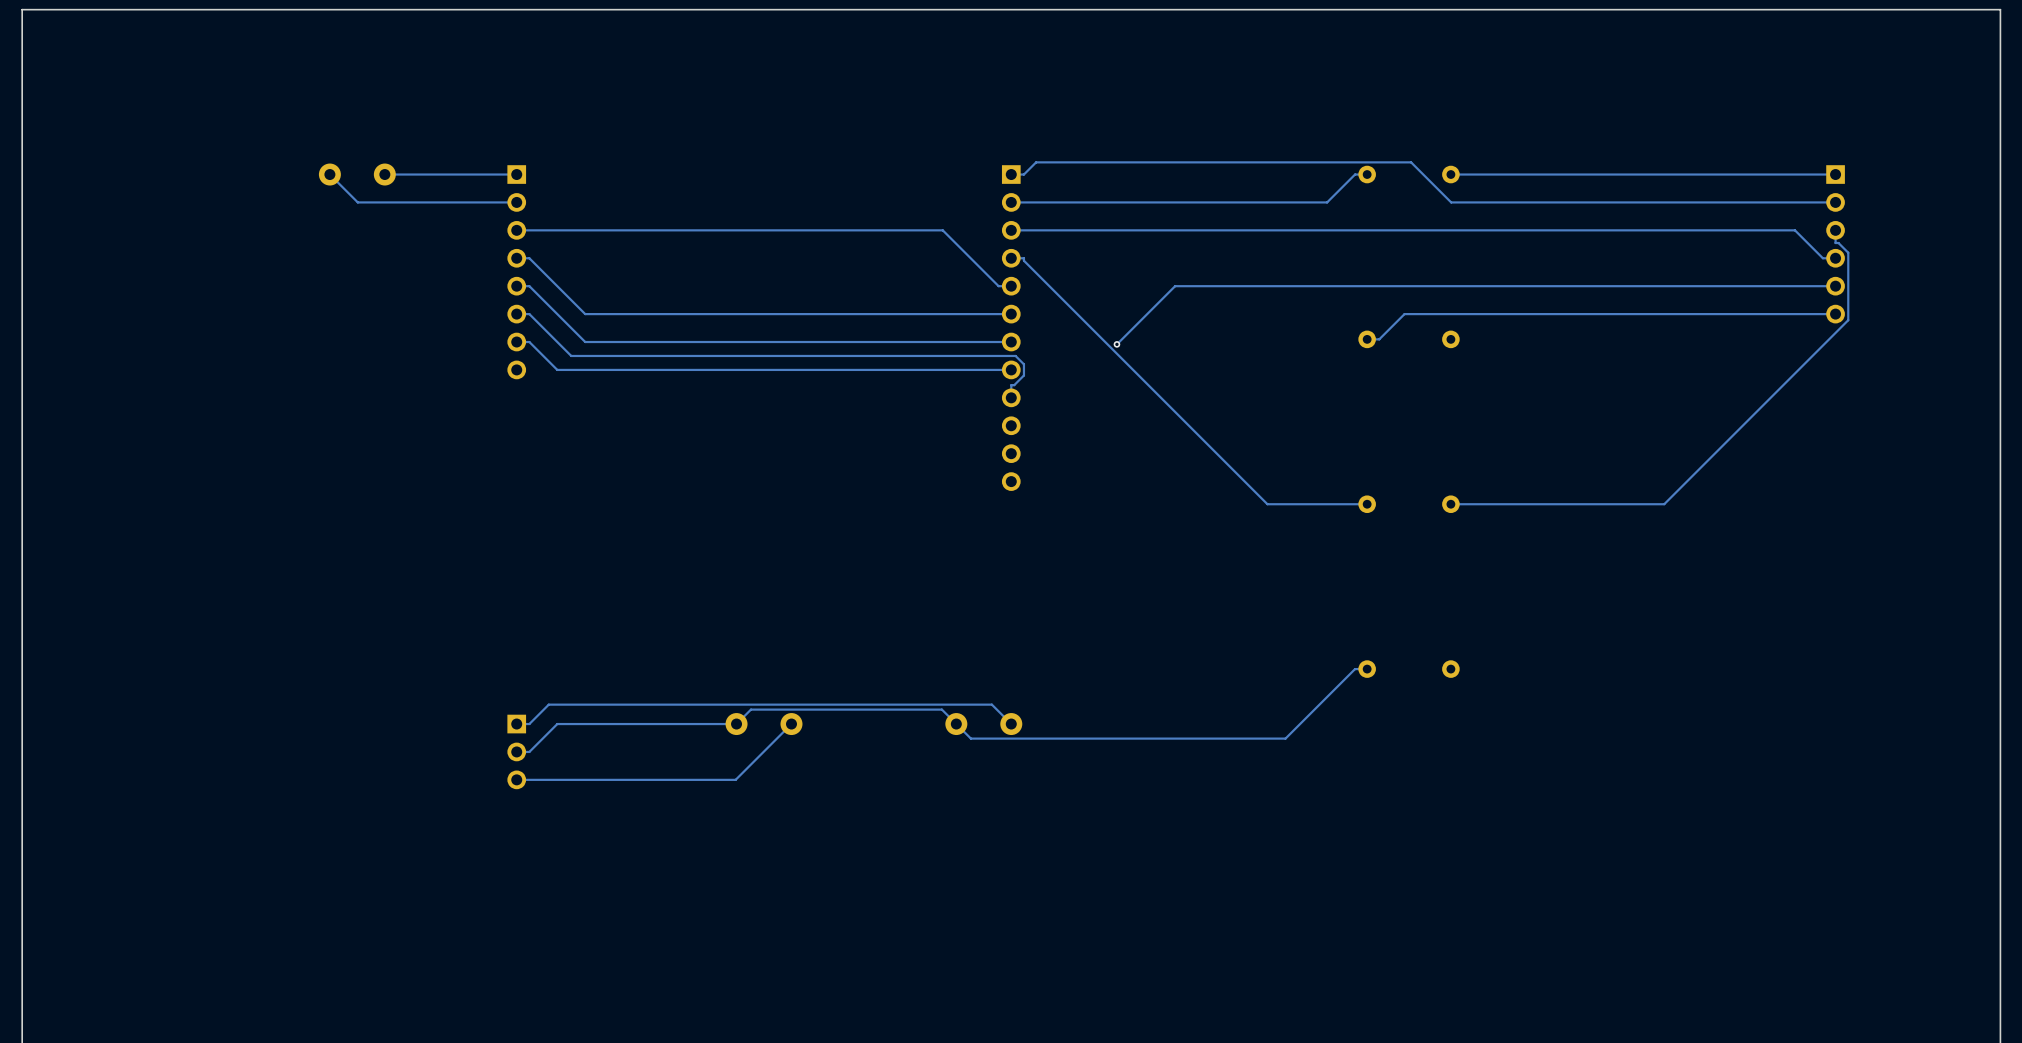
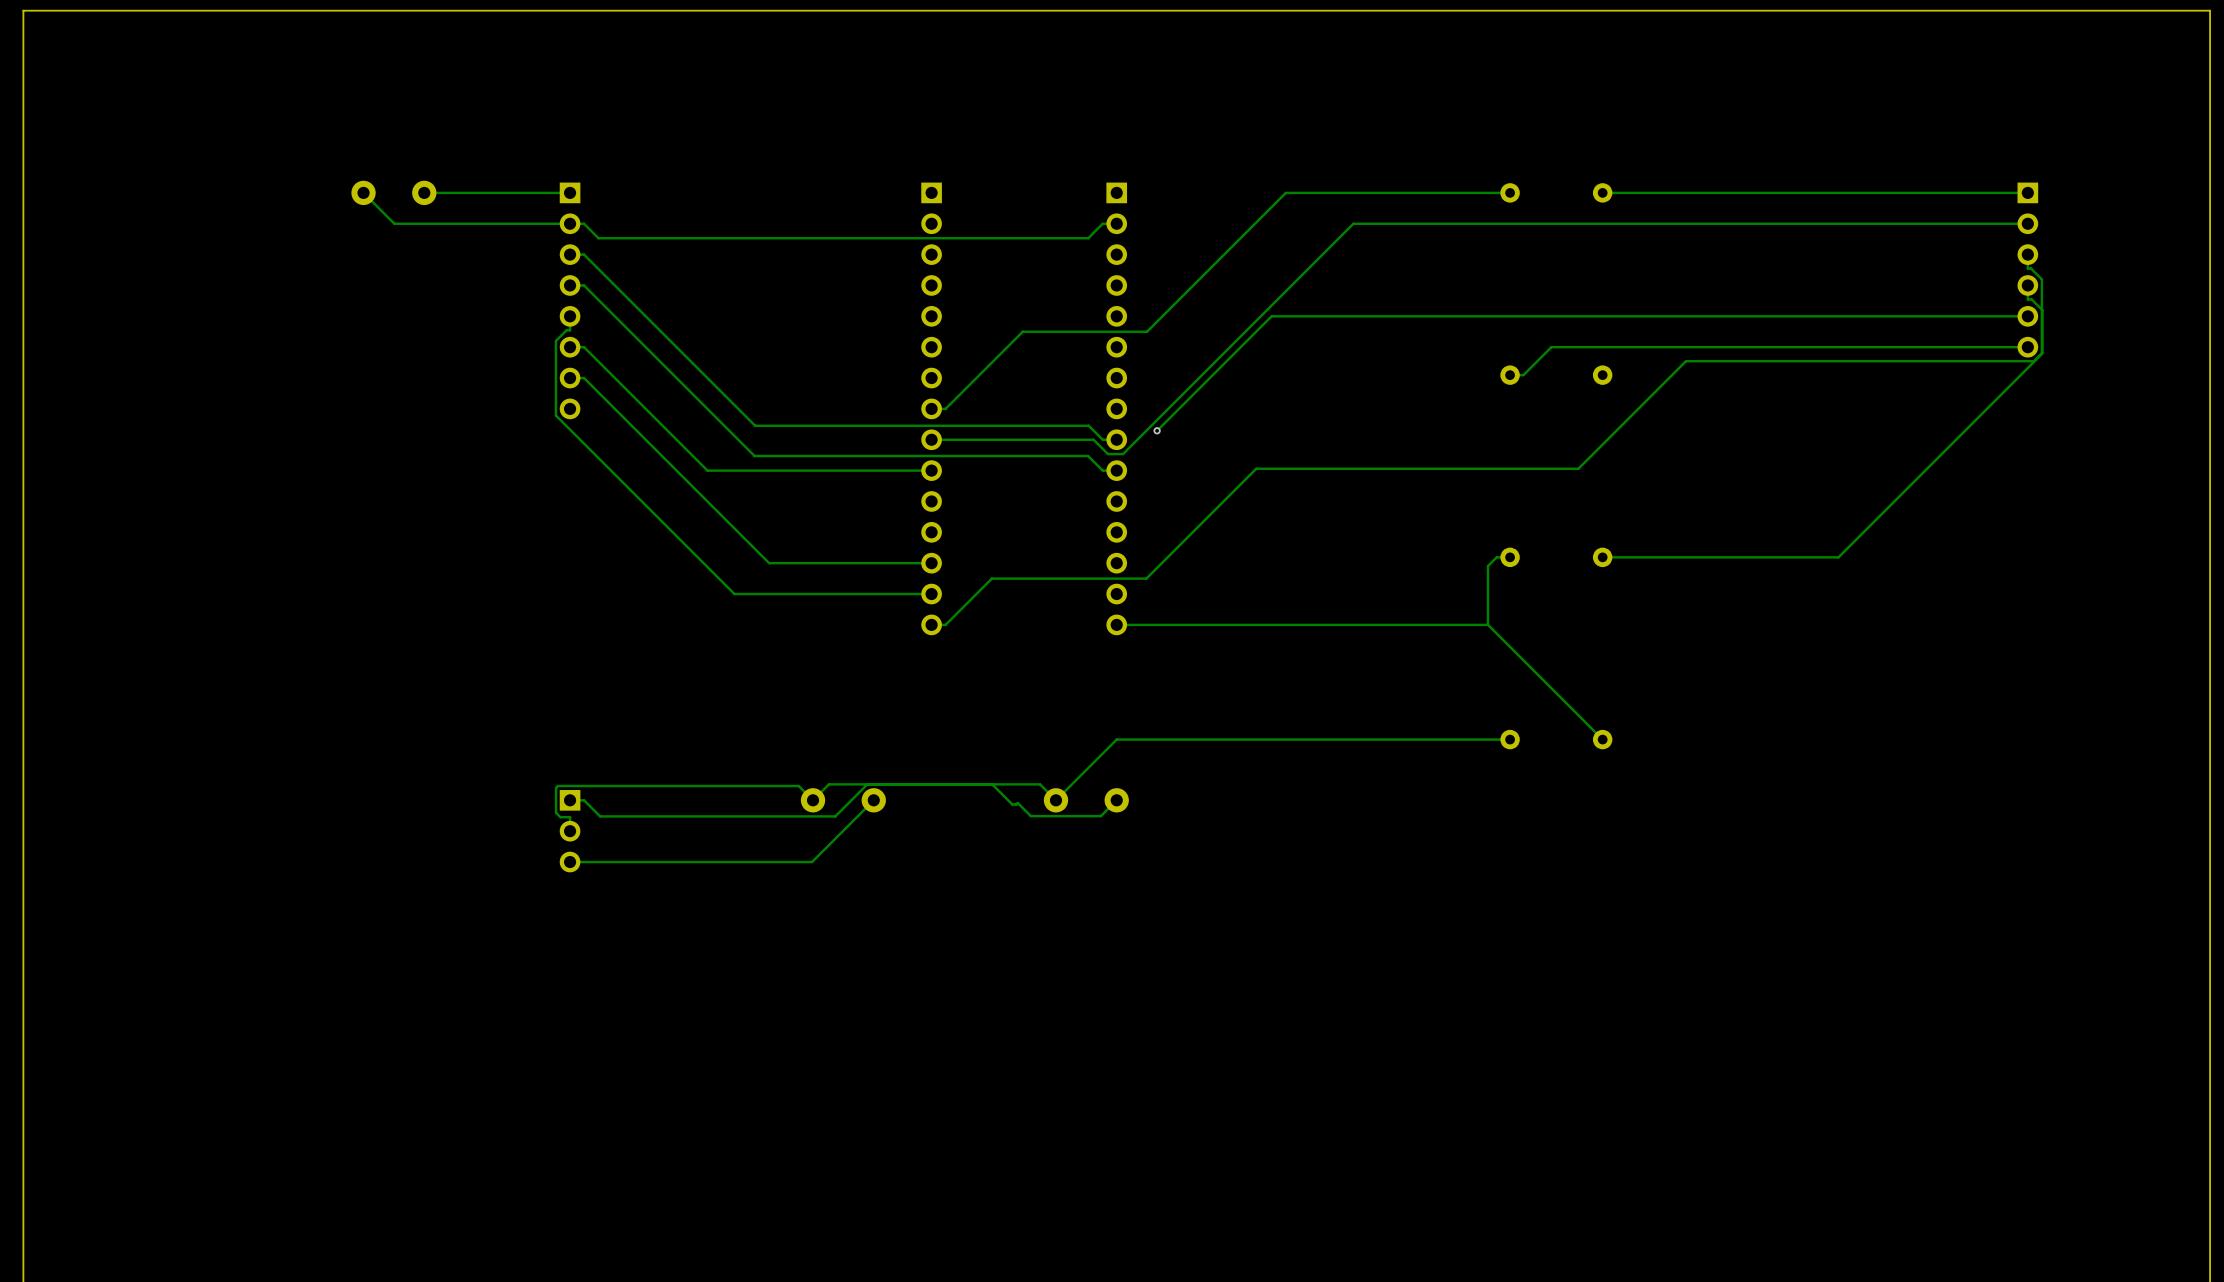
track: (1011, 174) (1023, 174) (1036, 162) (1411, 162) (1451, 202) -> none
track: (1355, 174) (1327, 202) -> (1602, 223) (1465, 223)
track: none -> (1116, 223) (1102, 223) (1088, 238) (598, 238) (584, 223) (570, 223)
track: (1225, 202) (1011, 202) -> (1353, 223) (1123, 454) (1107, 454) (1093, 439) (931, 439)
track: (529, 230) (942, 230) (998, 286) (1011, 286) -> (584, 254) (755, 425) (1088, 425) (1102, 439) (1116, 439)
track: (1011, 230) (1794, 230) (1822, 258) (1835, 258) -> (931, 624) (945, 624) (991, 578) (1146, 578) (1256, 468) (1578, 468) (1685, 361) (2033, 361) (2042, 352) (2042, 310) (2031, 299) (2027, 299) (2027, 285)
track: (1011, 258) (1023, 258) (1023, 260) (1267, 504) (1355, 504) -> (1487, 624) (1487, 566) (1496, 557)
track: (516, 286) (529, 286) (585, 342) (1011, 342) -> (570, 316) (570, 330) (566, 330) (555, 340) (555, 415) (734, 594) (931, 594)
track: (1175, 286) (1116, 344) -> (1297, 316) (1271, 316) (1157, 430)
track: (1011, 314) (585, 314) -> (1116, 470) (1102, 470) (1088, 456) (754, 456) (645, 347)
part: (1011, 328) -> none
via: (1116, 344) -> none
track: (571, 355) (1015, 355) (1023, 364) (1023, 375) (1014, 385) (1011, 385) (1011, 397) -> (630, 393) (707, 470) (931, 470)
track: (843, 369) (557, 369) -> (931, 563) (769, 563) (614, 408)
part: none -> (931, 408)
track: (1011, 369) (856, 369) -> (1496, 192) (1285, 192) (1146, 331) (1022, 331) (945, 408)
part: none -> (1116, 408)
via: none -> (1157, 430)
track: none -> (1487, 624) (1116, 624)
track: none -> (1487, 624) (1602, 739)
track: (1355, 669) (1285, 738) (970, 738) (956, 724) -> (1496, 739) (1116, 739) (1055, 800)
track: (736, 724) (557, 724) (529, 751) (516, 751) -> (813, 800) (798, 786) (557, 786) (556, 787) (556, 812) (560, 817) (570, 817) (570, 831)
track: (1011, 724) (991, 704) (548, 704) (529, 724) -> (1116, 800) (1100, 816) (1030, 816) (1017, 803) (1012, 804) (992, 784) (867, 784) (835, 816) (600, 816) (584, 800)

